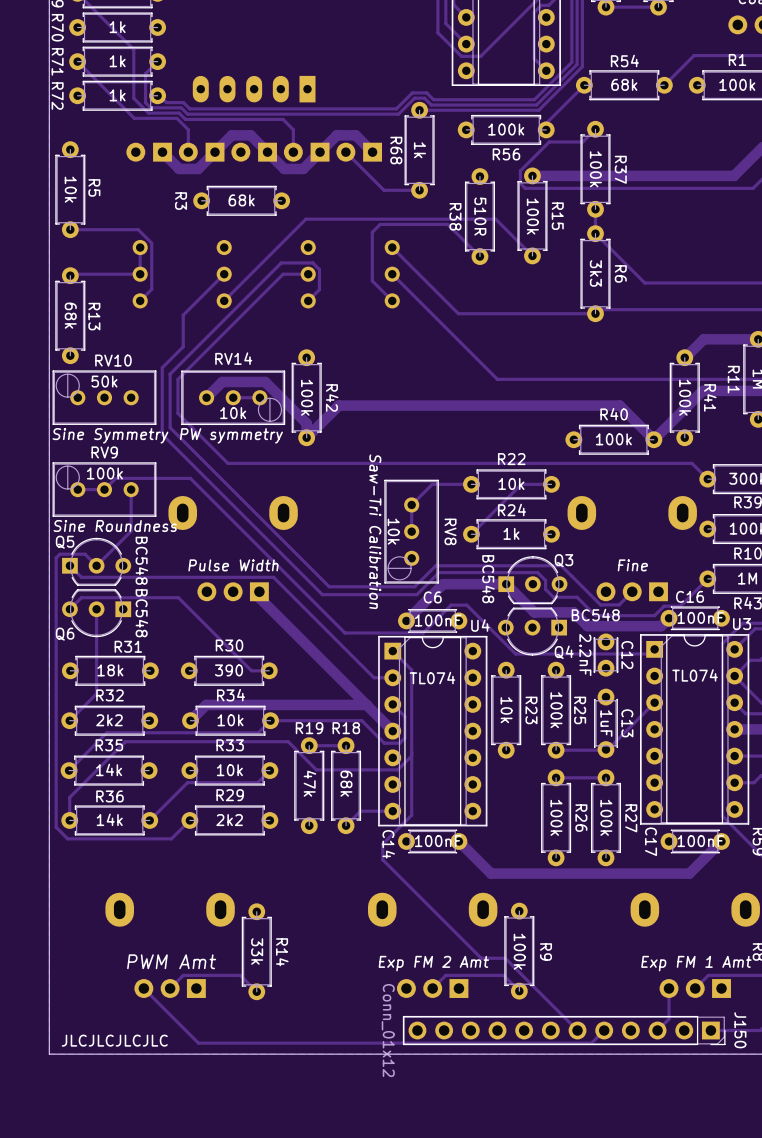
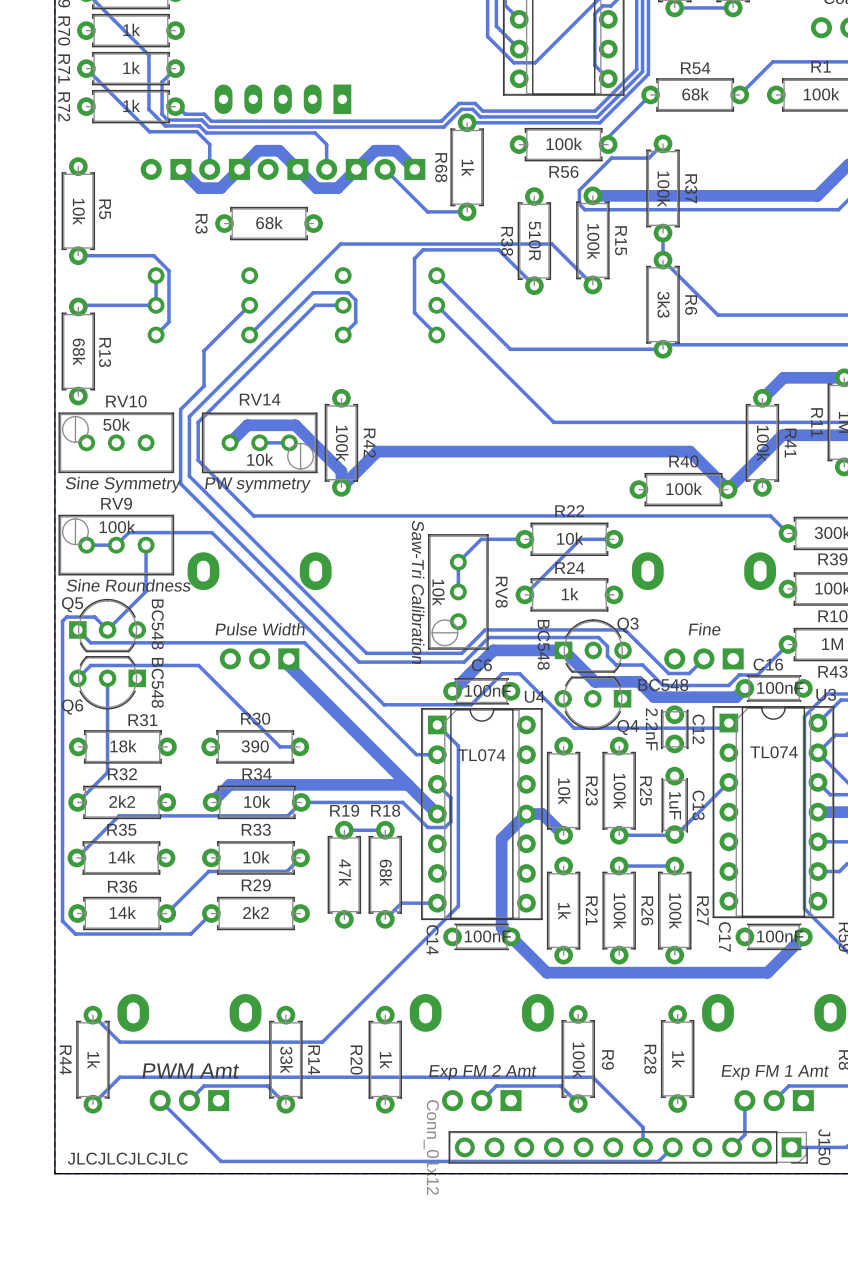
track: none -> (563, 835) (542, 814) (526, 814) (501, 838) (501, 927) (511, 936)
track: (411, 755) (397, 769) (316, 769) (288, 741) (125, 741) (69, 797) (69, 820) -> none
track: (411, 813) (382, 844) (382, 859) (481, 958) (505, 958) (577, 1030) -> (92, 1104) (119, 1077) (592, 1077) (643, 1127) (643, 1147)
track: none -> (458, 906) (322, 1042) (119, 1042) (92, 1015)
R21: none -> 1k (563, 910)
R44: none -> 1k (92, 1059)
R20: none -> 1k (385, 1059)
R28: none -> 1k (677, 1058)

